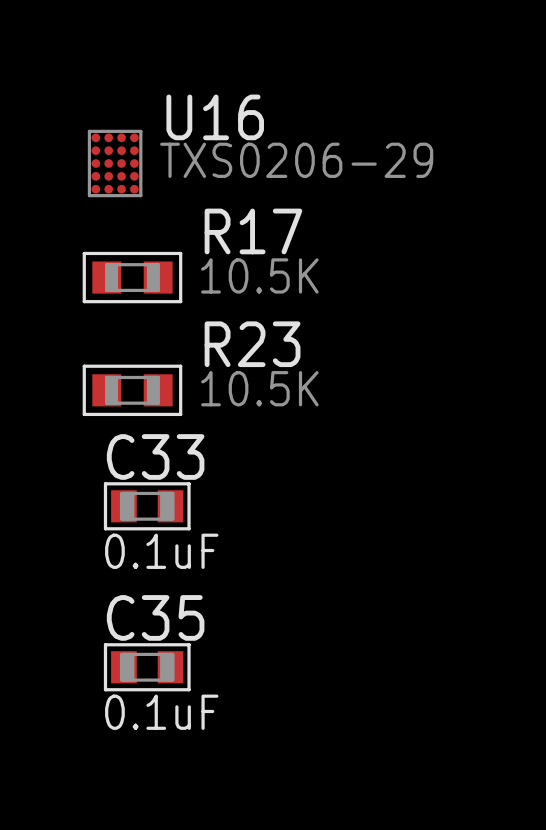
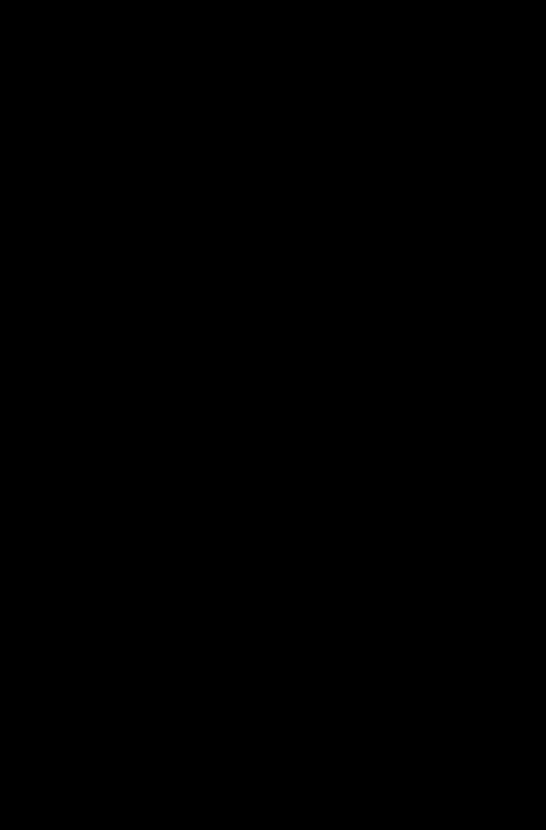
U16: TXS0206-29 (115, 163) -> none
R17: 10.5K (132, 277) -> none
R23: 10.5K (132, 390) -> none
C33: 0.1uF (147, 506) -> none
C35: 0.1uF (147, 667) -> none

